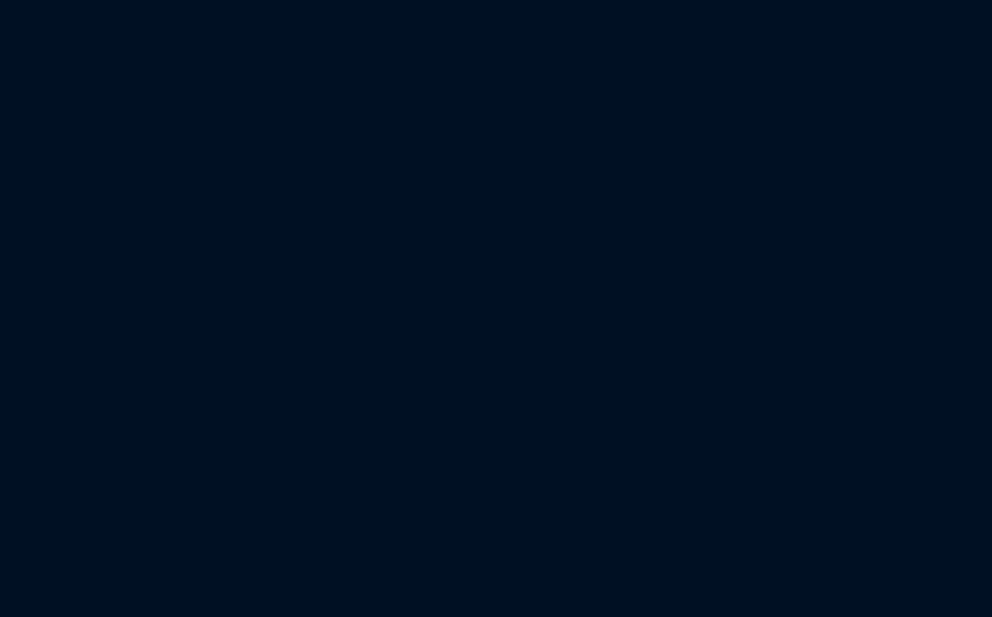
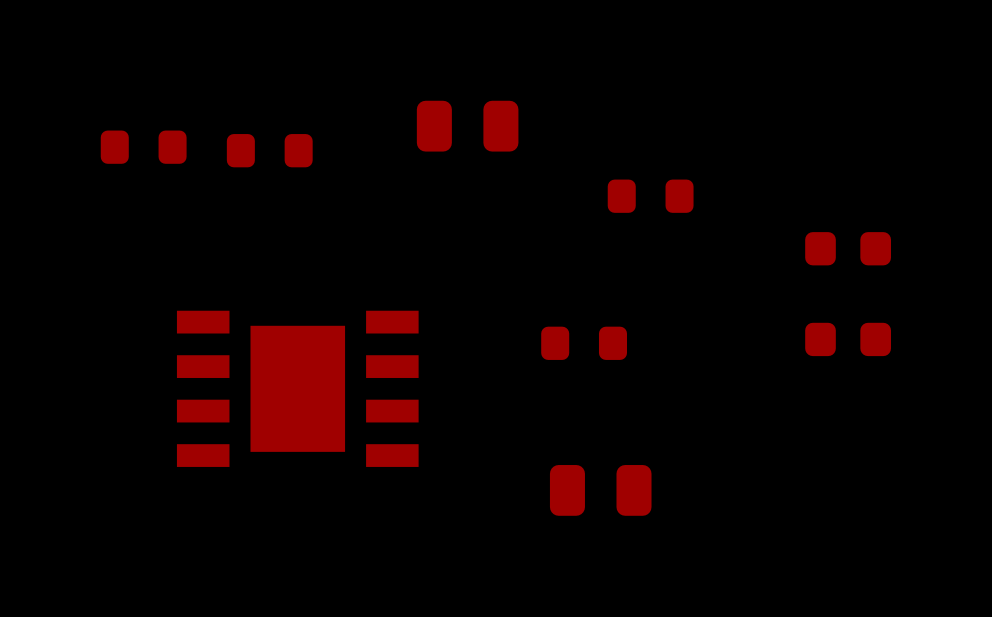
part: none -> (467, 126)
part: none -> (143, 147)
part: none -> (269, 150)
part: none -> (650, 196)
part: none -> (848, 248)
part: none -> (848, 339)
part: none -> (584, 343)
part: none -> (297, 388)
part: none -> (600, 490)

